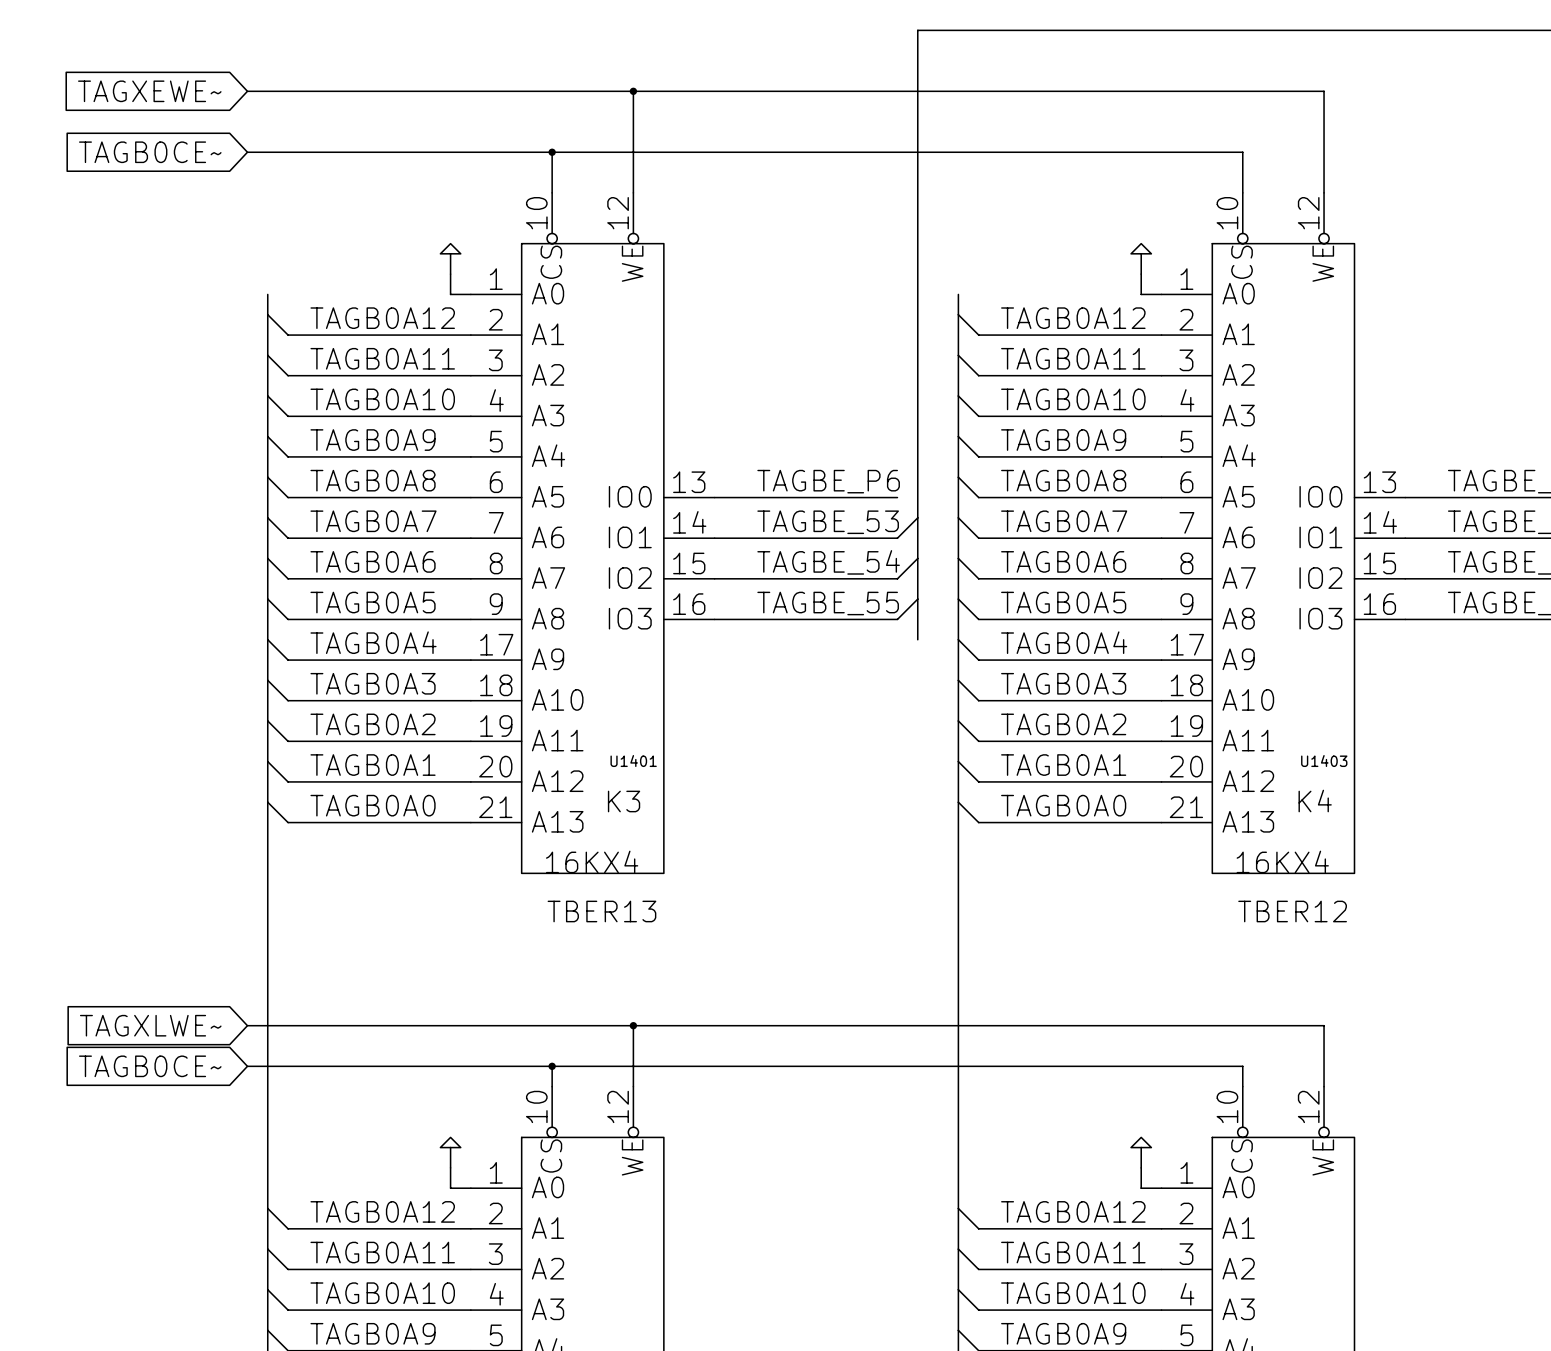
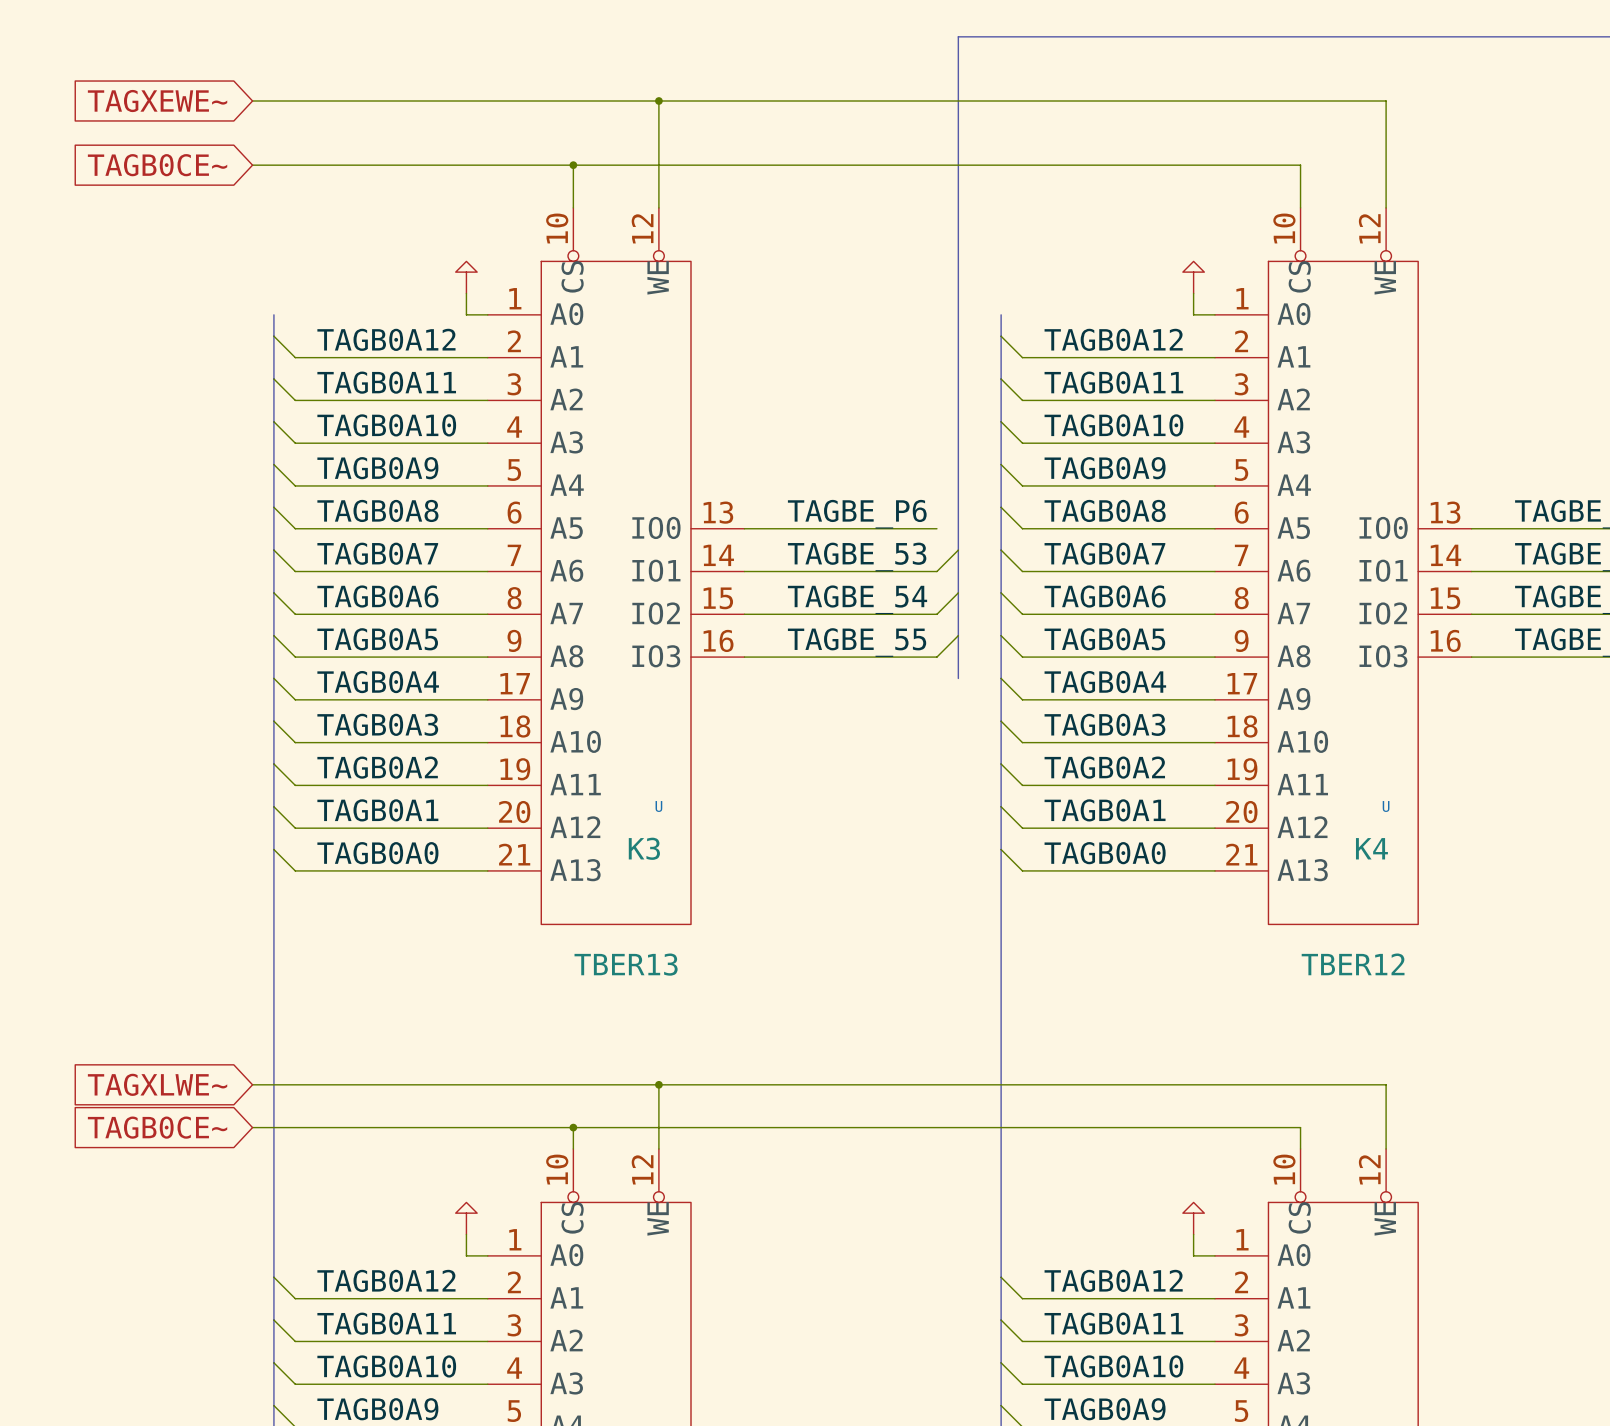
U1401 name: U1401 (633, 761) -> U (658, 806)
U1403 name: U1403 (1324, 761) -> U (1386, 806)
U1401 value: 16KX4 (592, 861) -> none
U1403 value: 16KX4 (1282, 861) -> none

